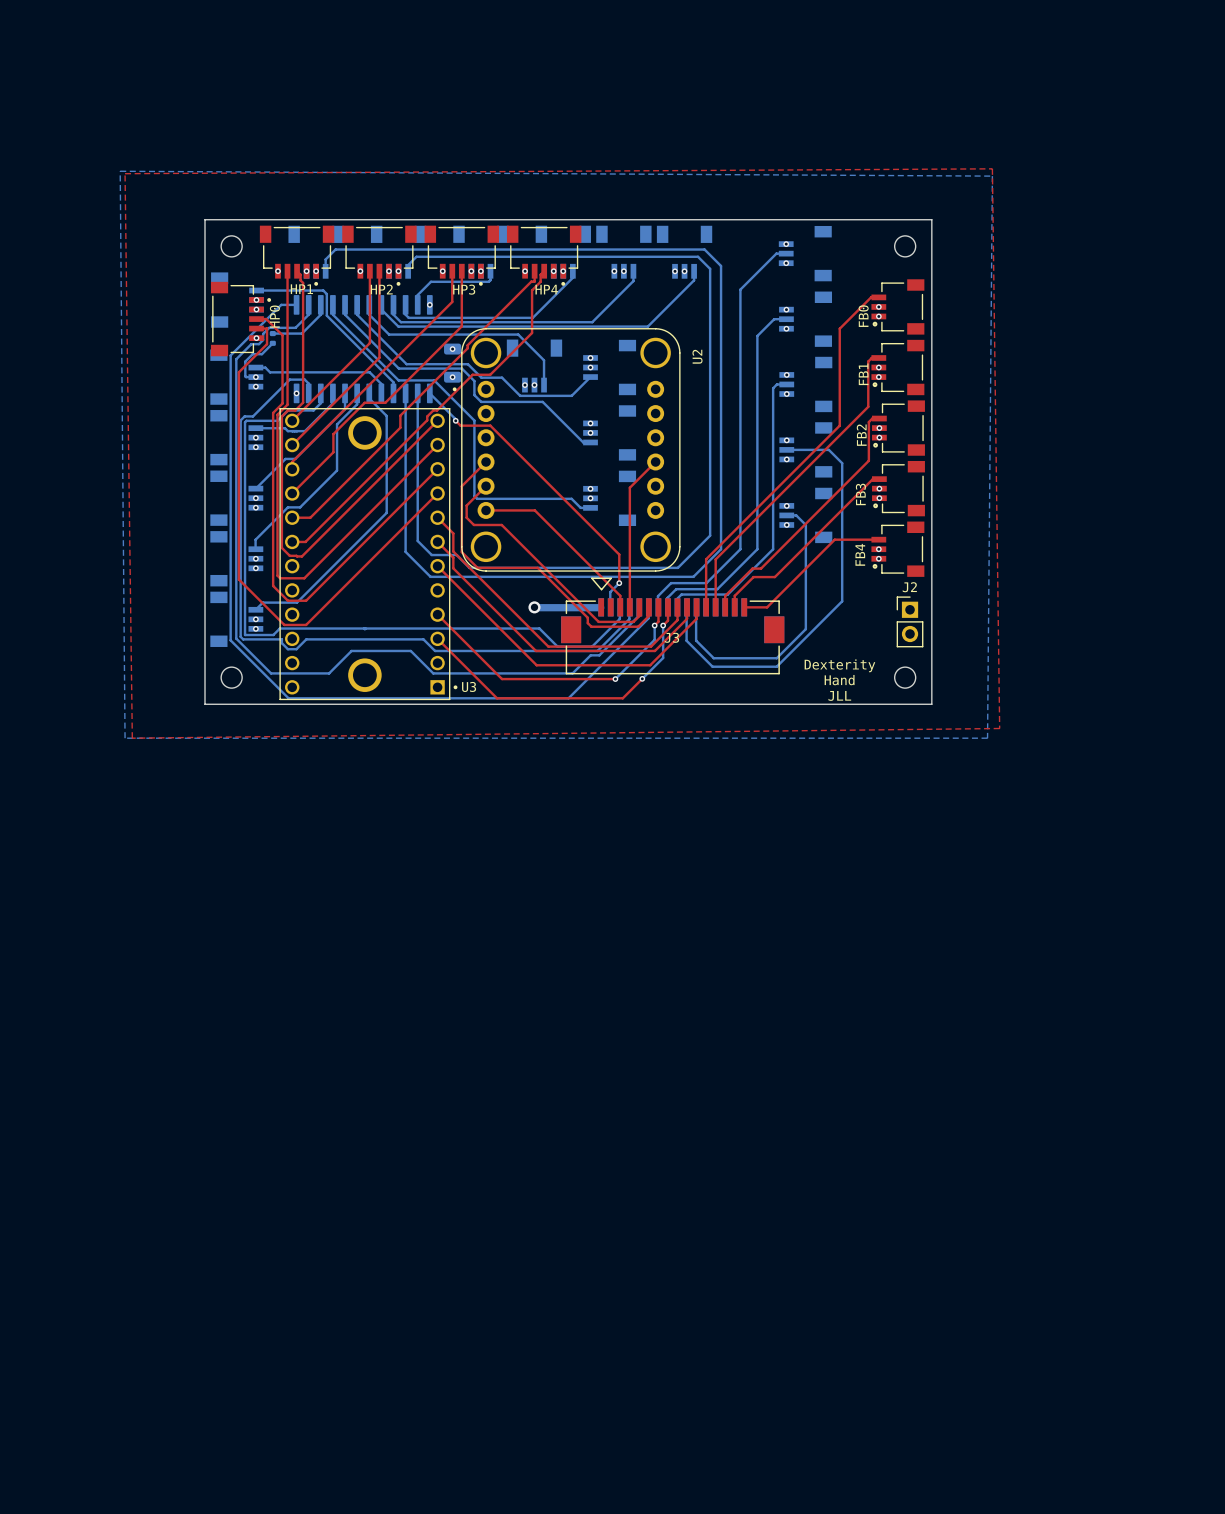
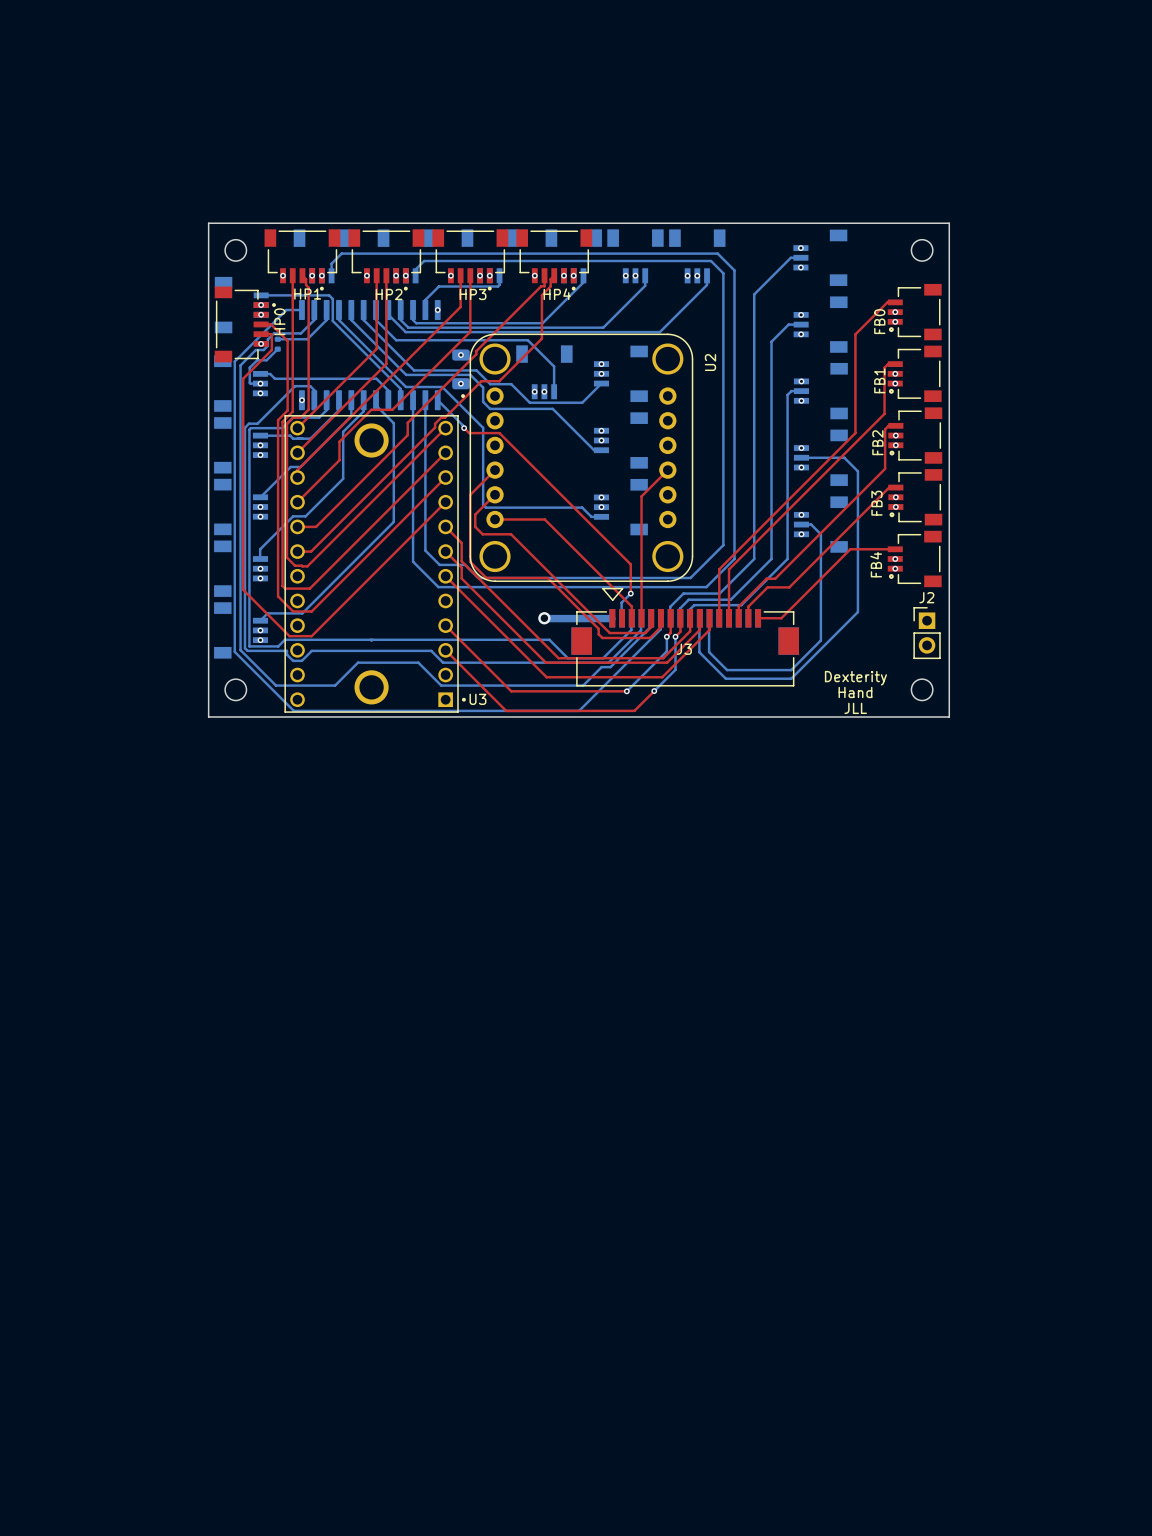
top zone outline: (992, 168) (125, 173) (132, 738) (999, 728) (992, 168) -> none
bottom zone outline: (120, 171) (992, 176) (987, 738) (125, 738) (120, 171) -> none

